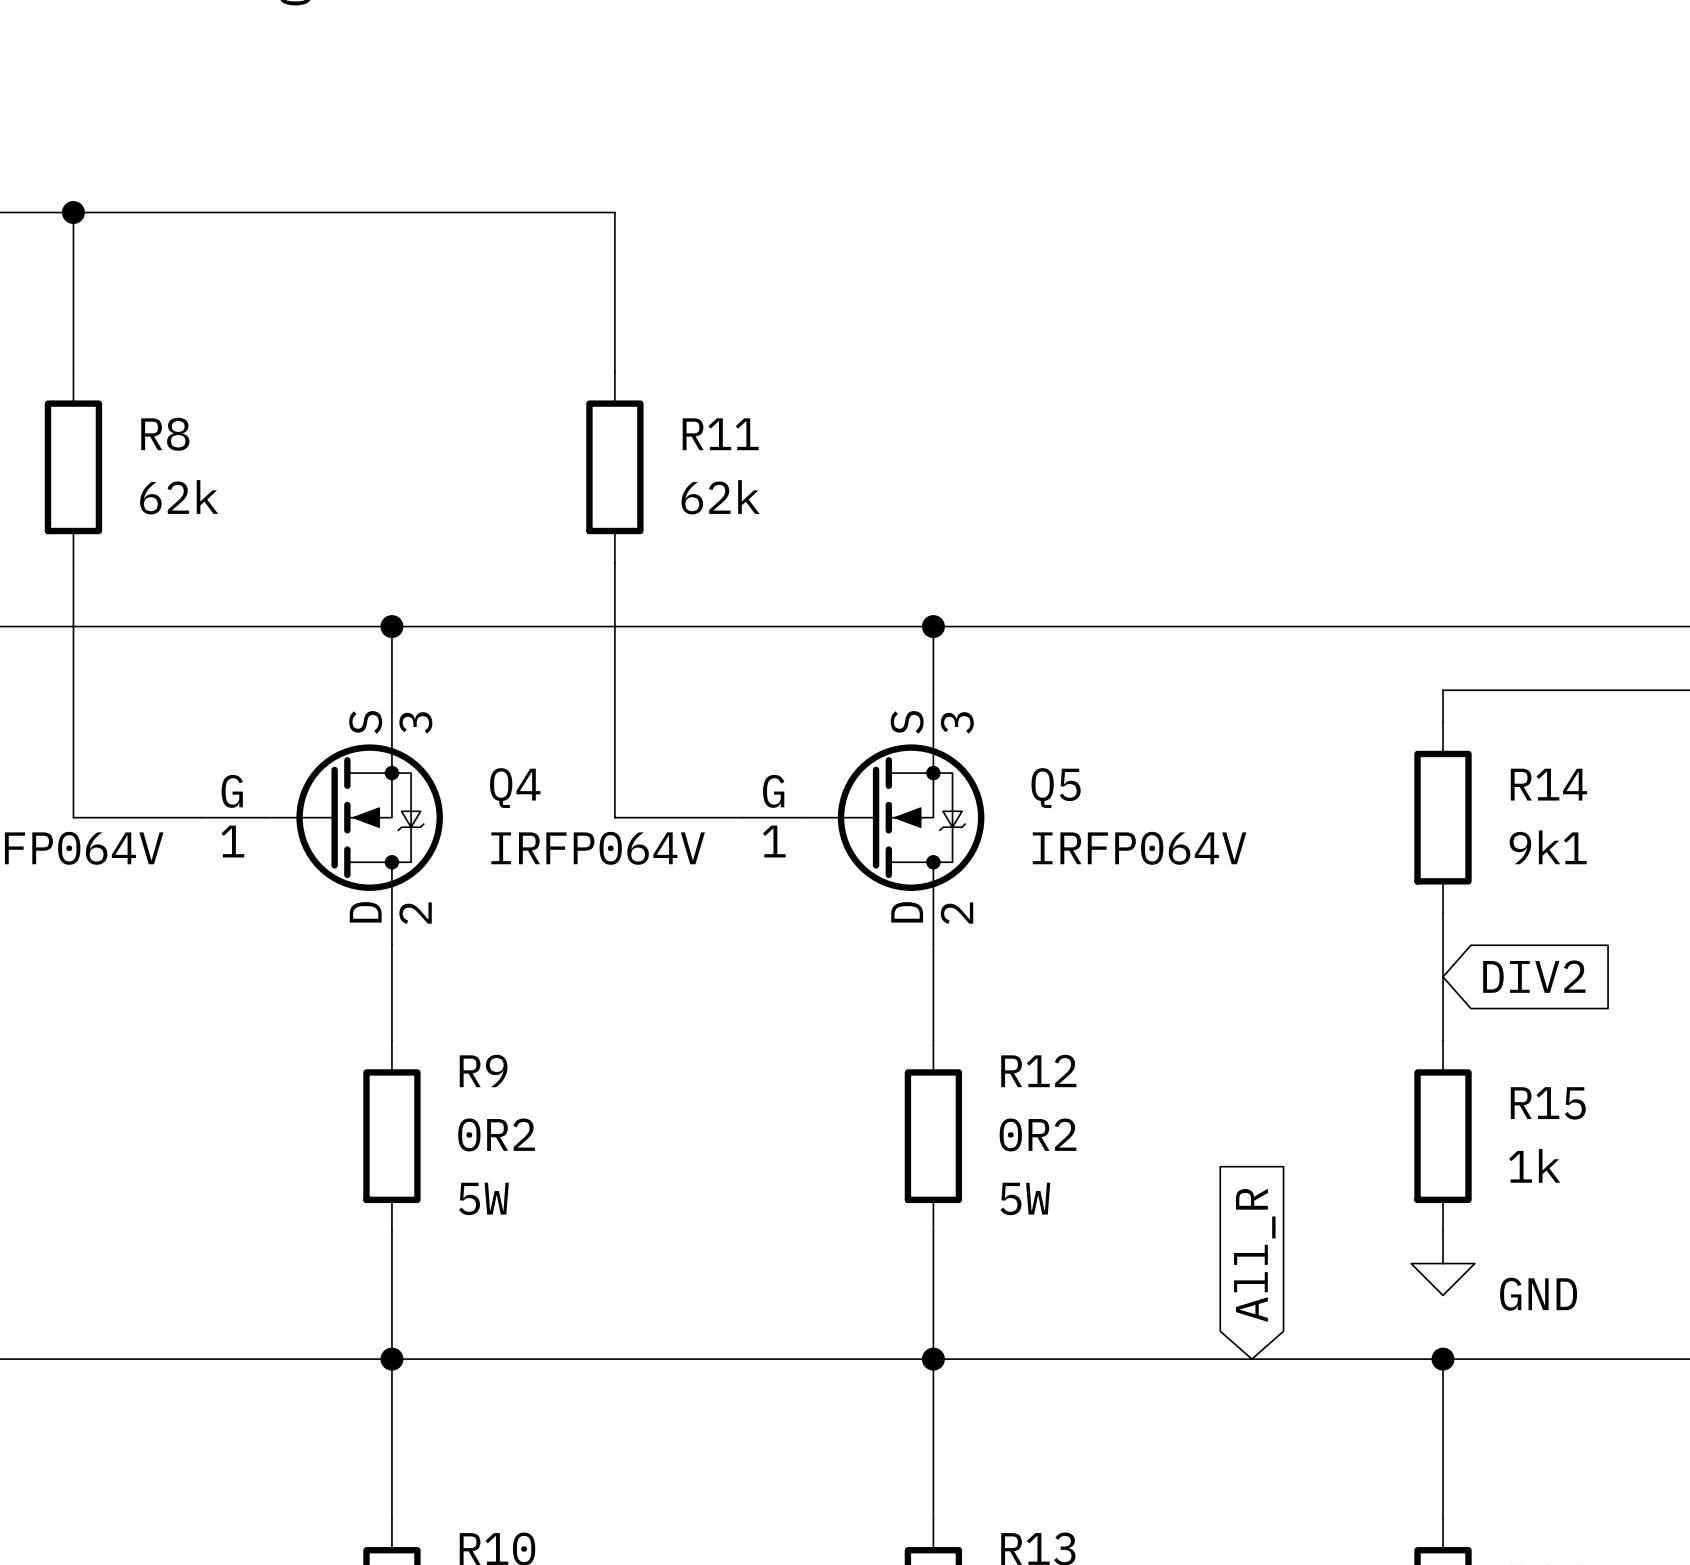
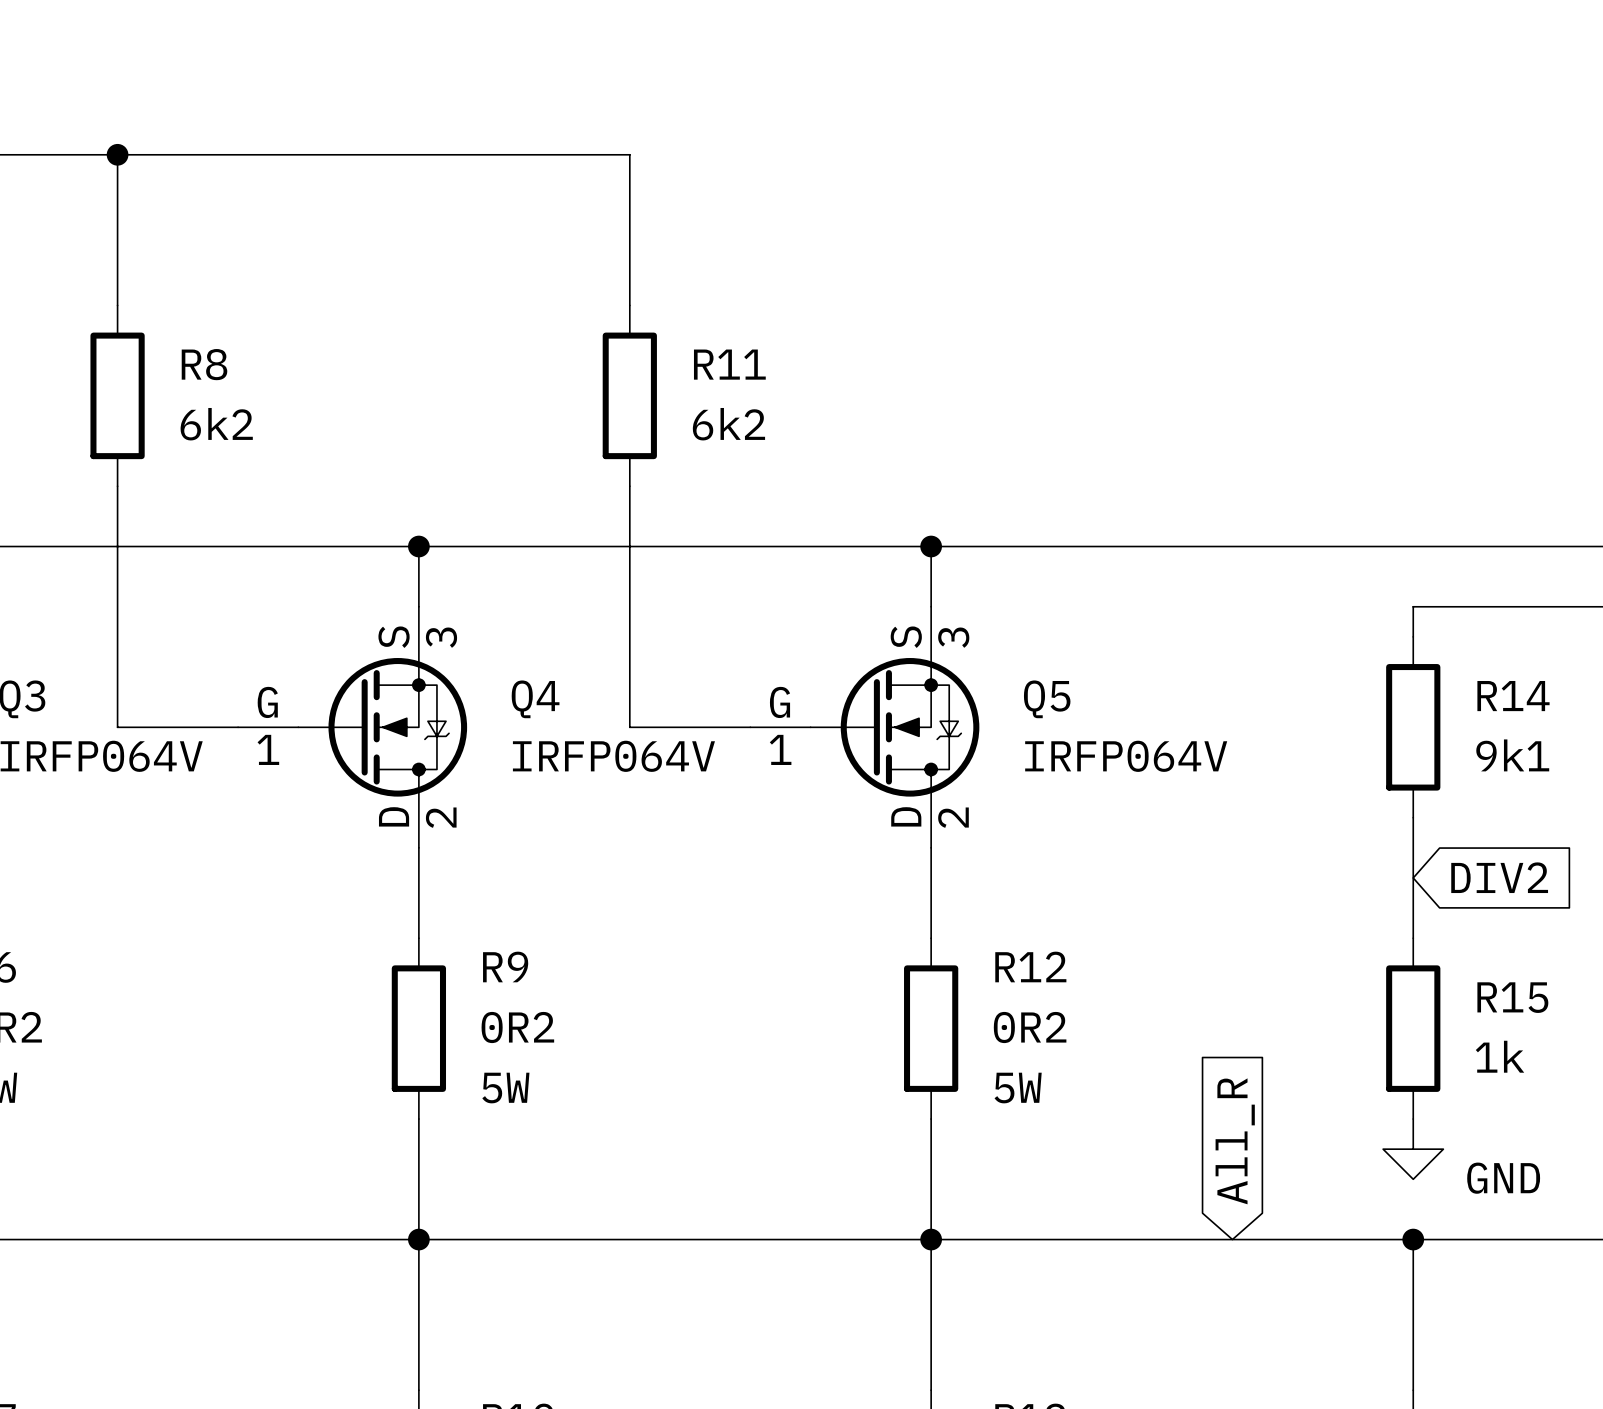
R8 value: 62k (179, 497) -> 6k2 (216, 424)
R11 value: 62k (720, 497) -> 6k2 (728, 424)

